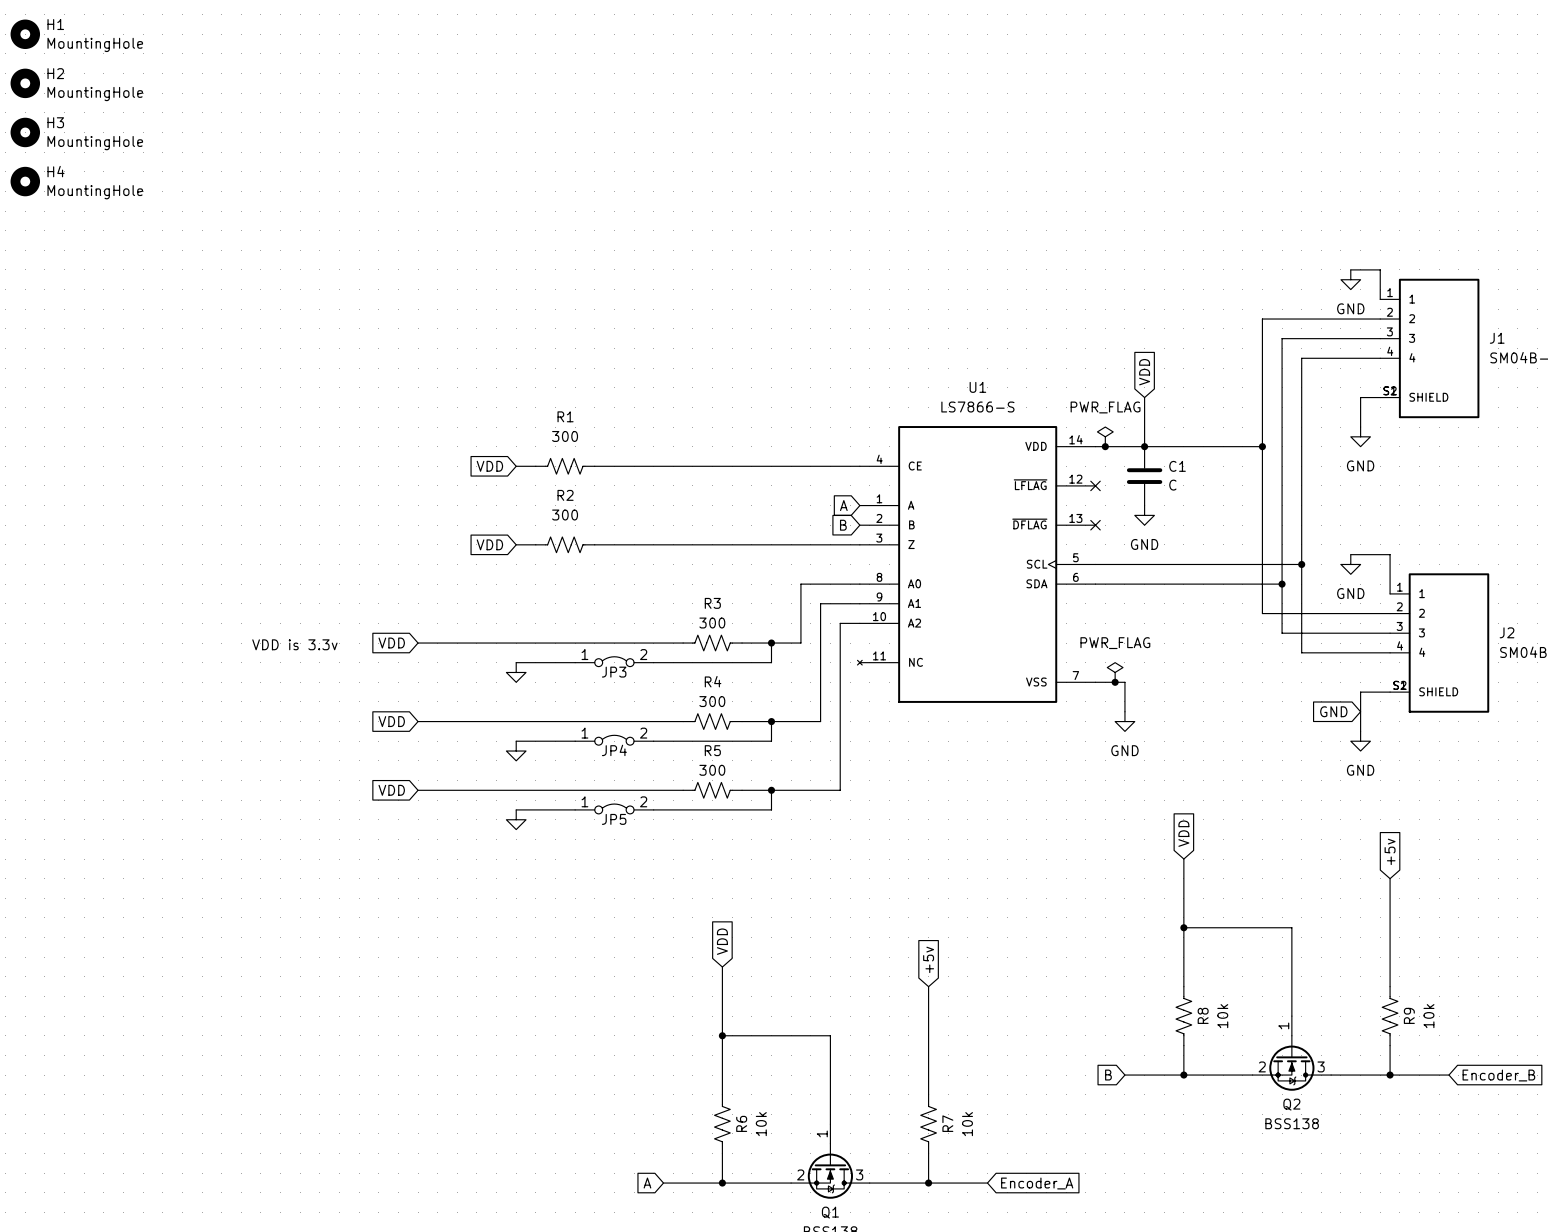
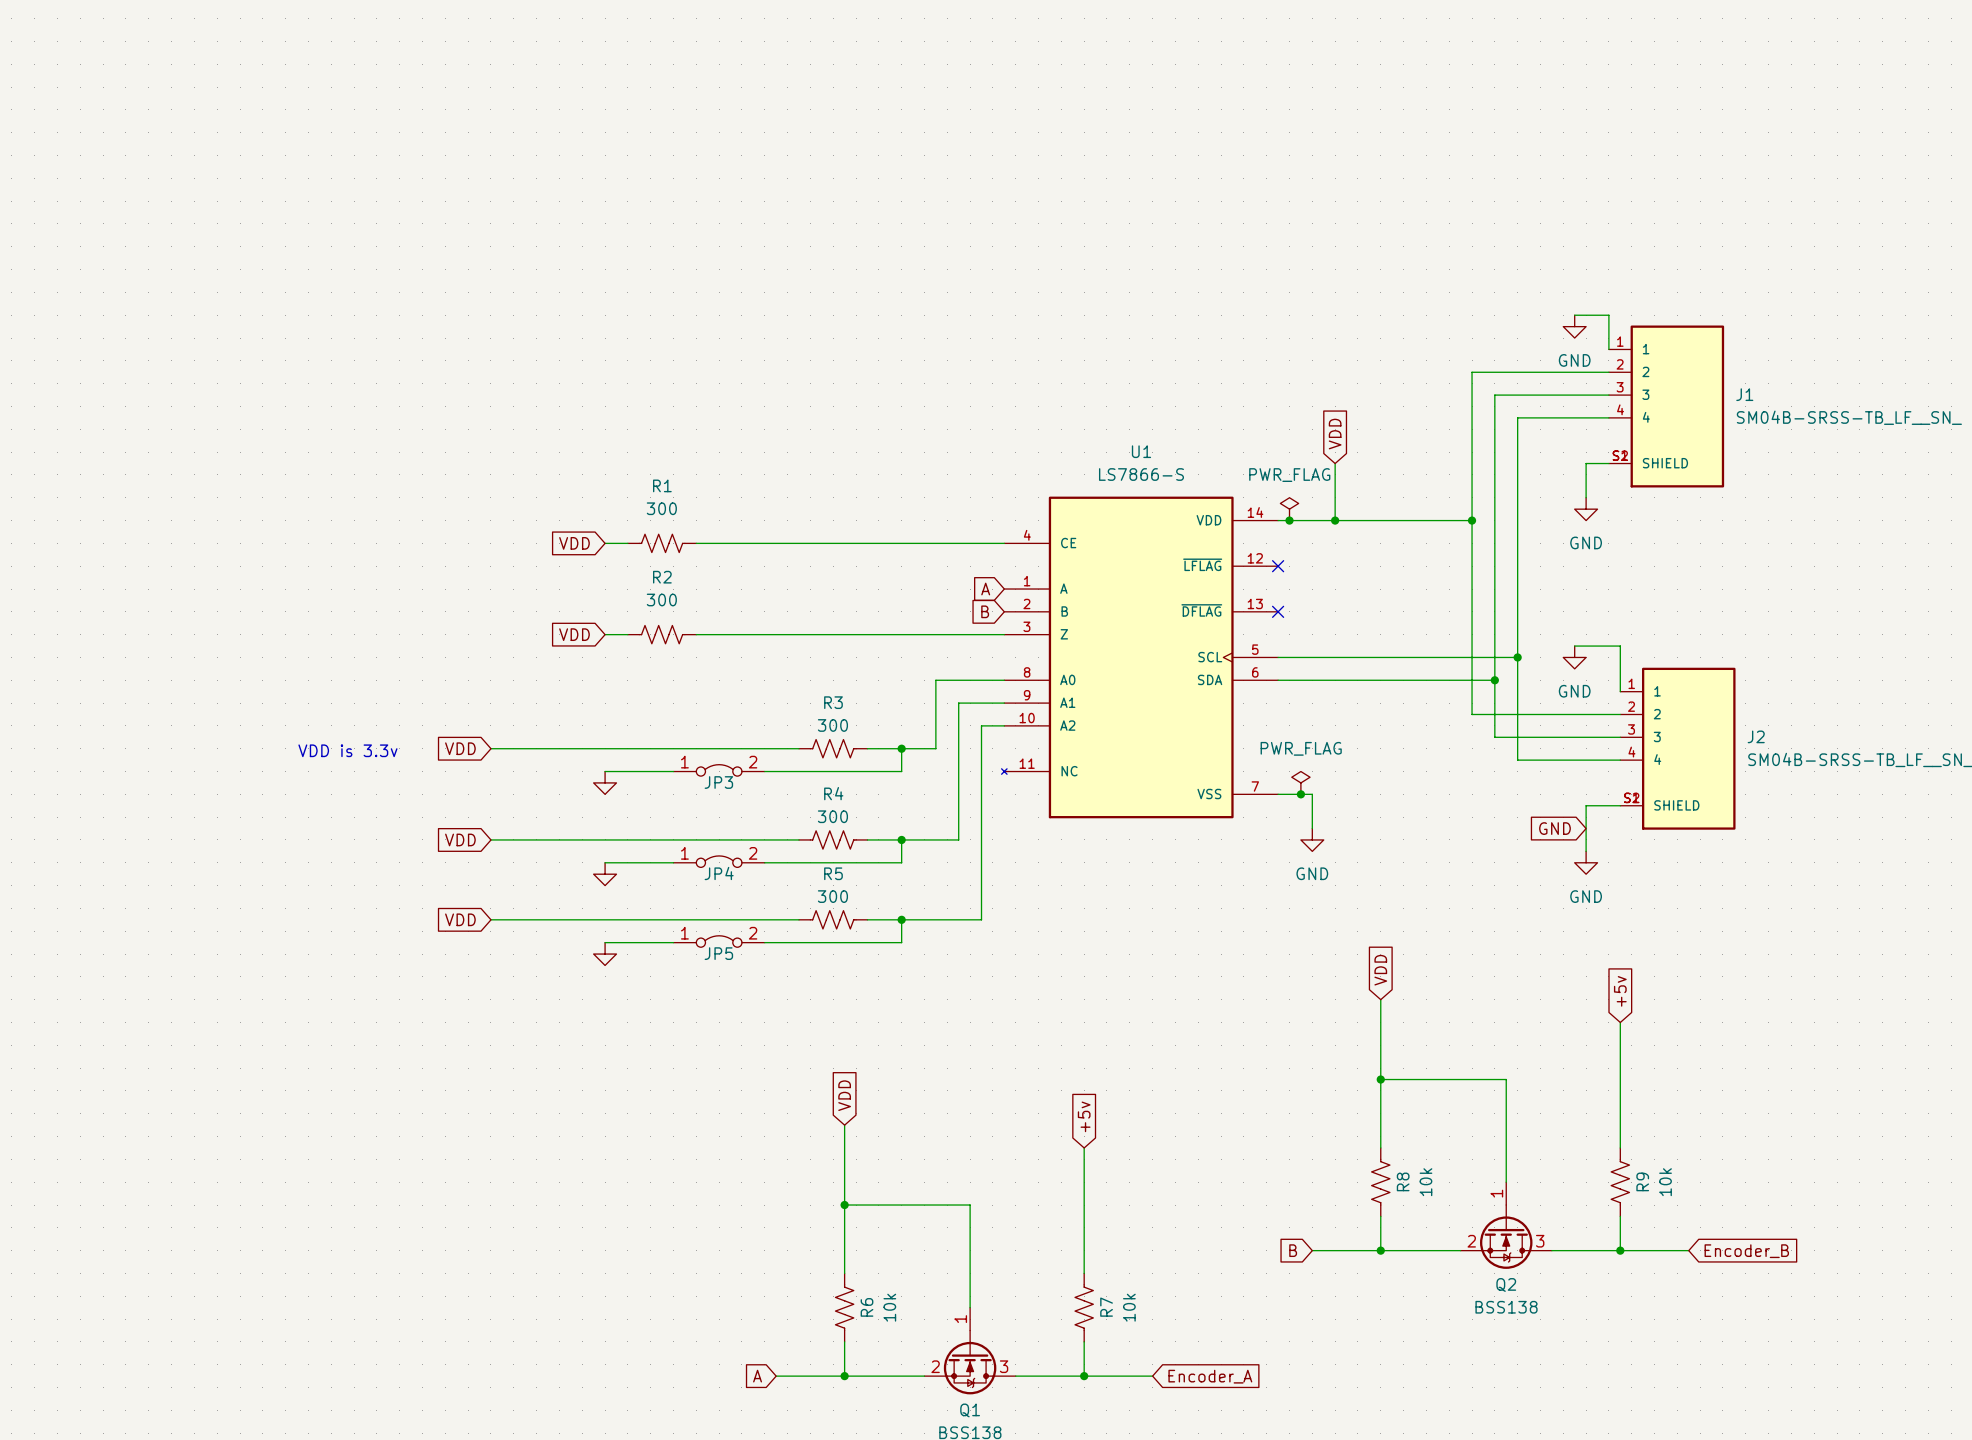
H1: MountingHole (25, 34) -> none
H2: MountingHole (25, 83) -> none
H3: MountingHole (25, 132) -> none
H4: MountingHole (25, 181) -> none
C1: C (1144, 476) -> none
power symbol: GND (1144, 515) -> none

